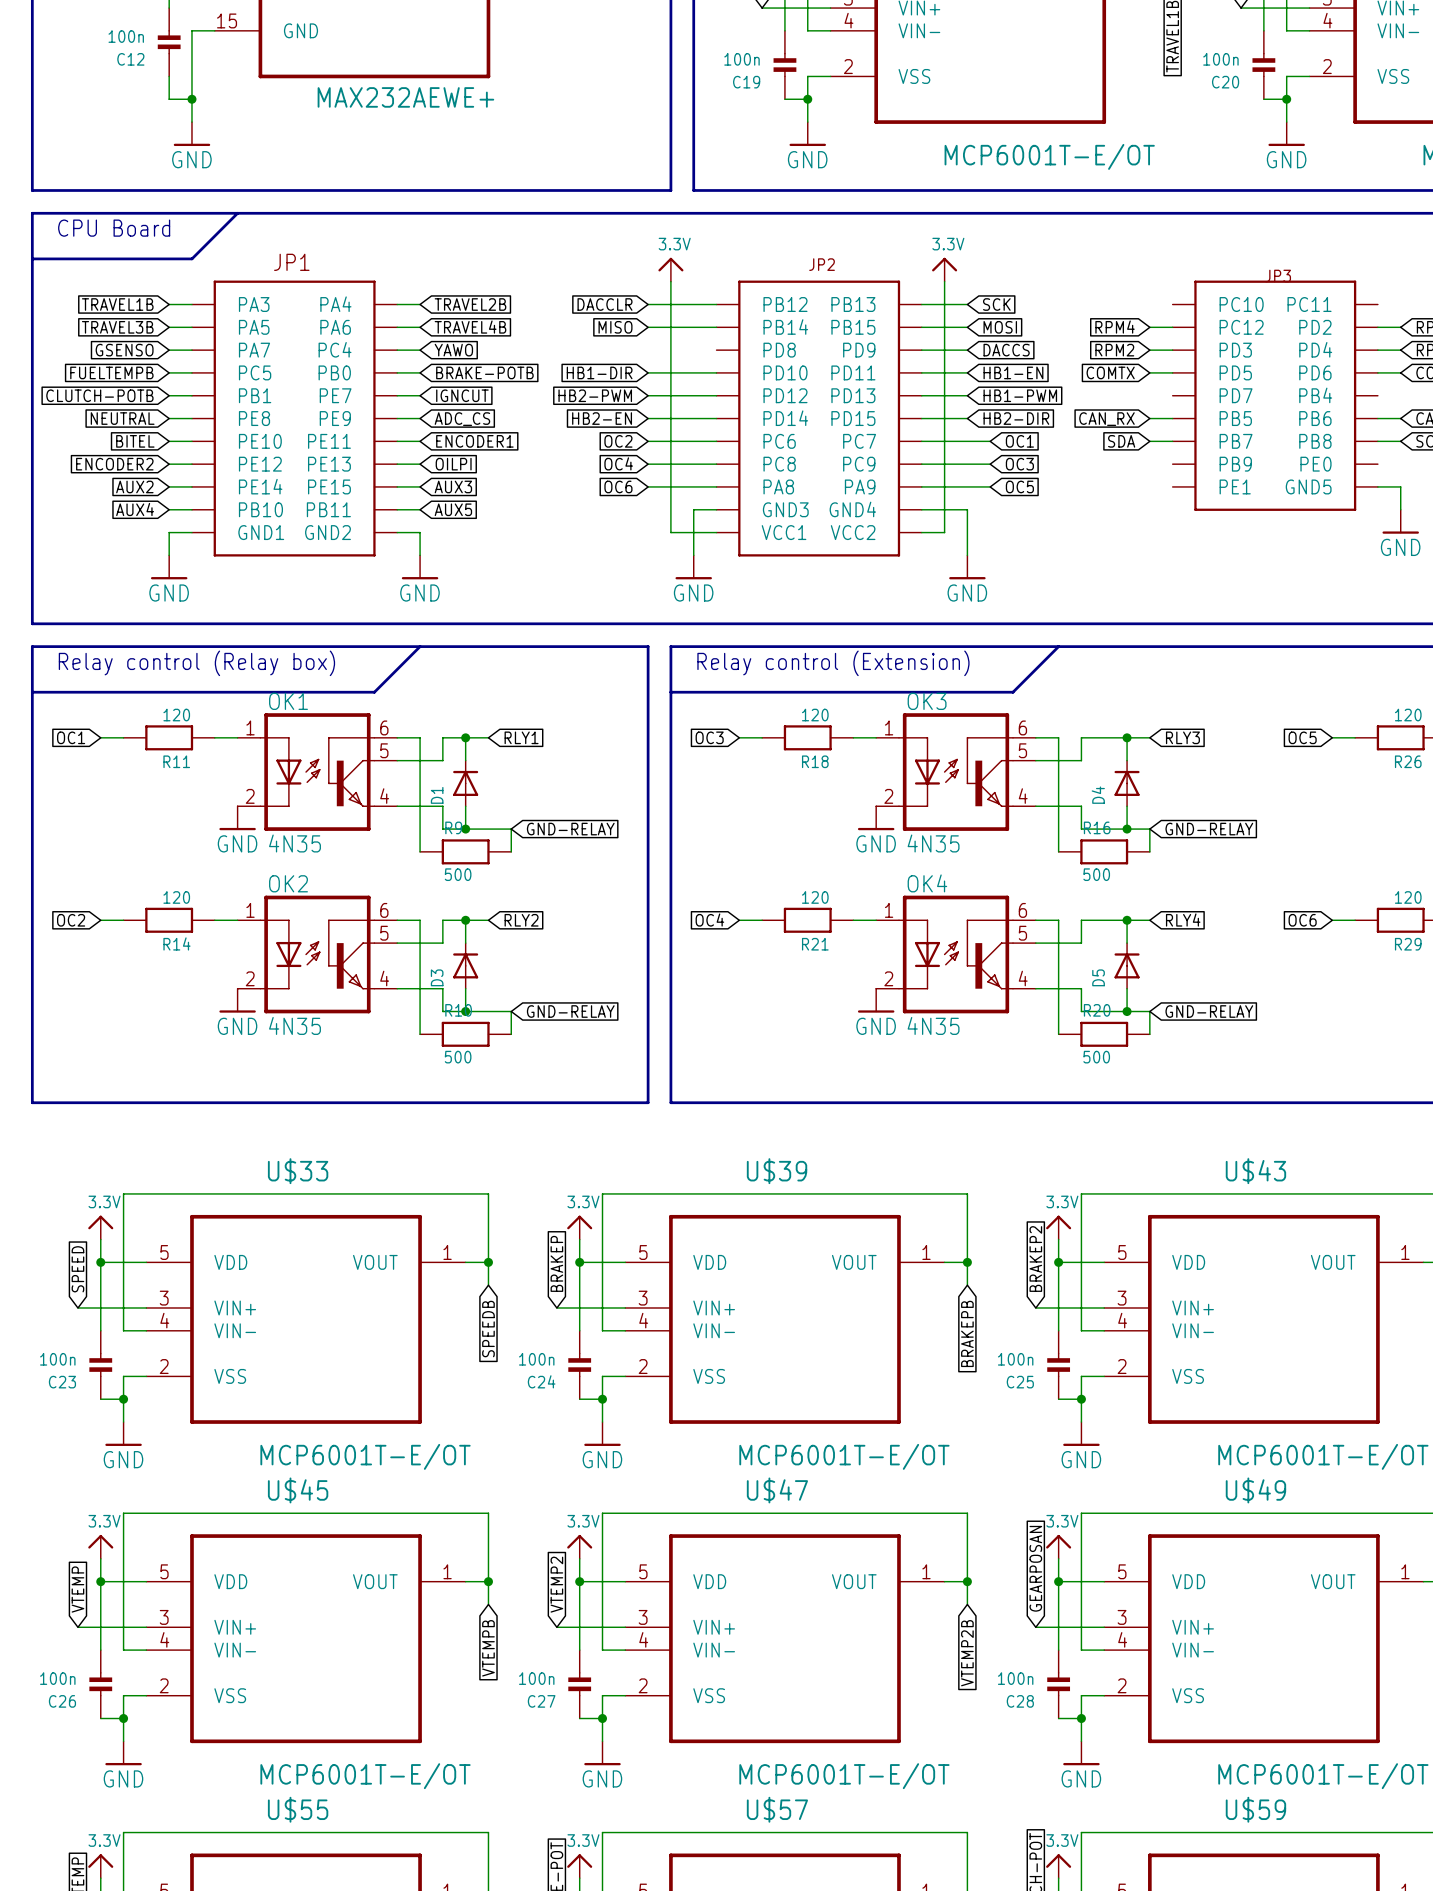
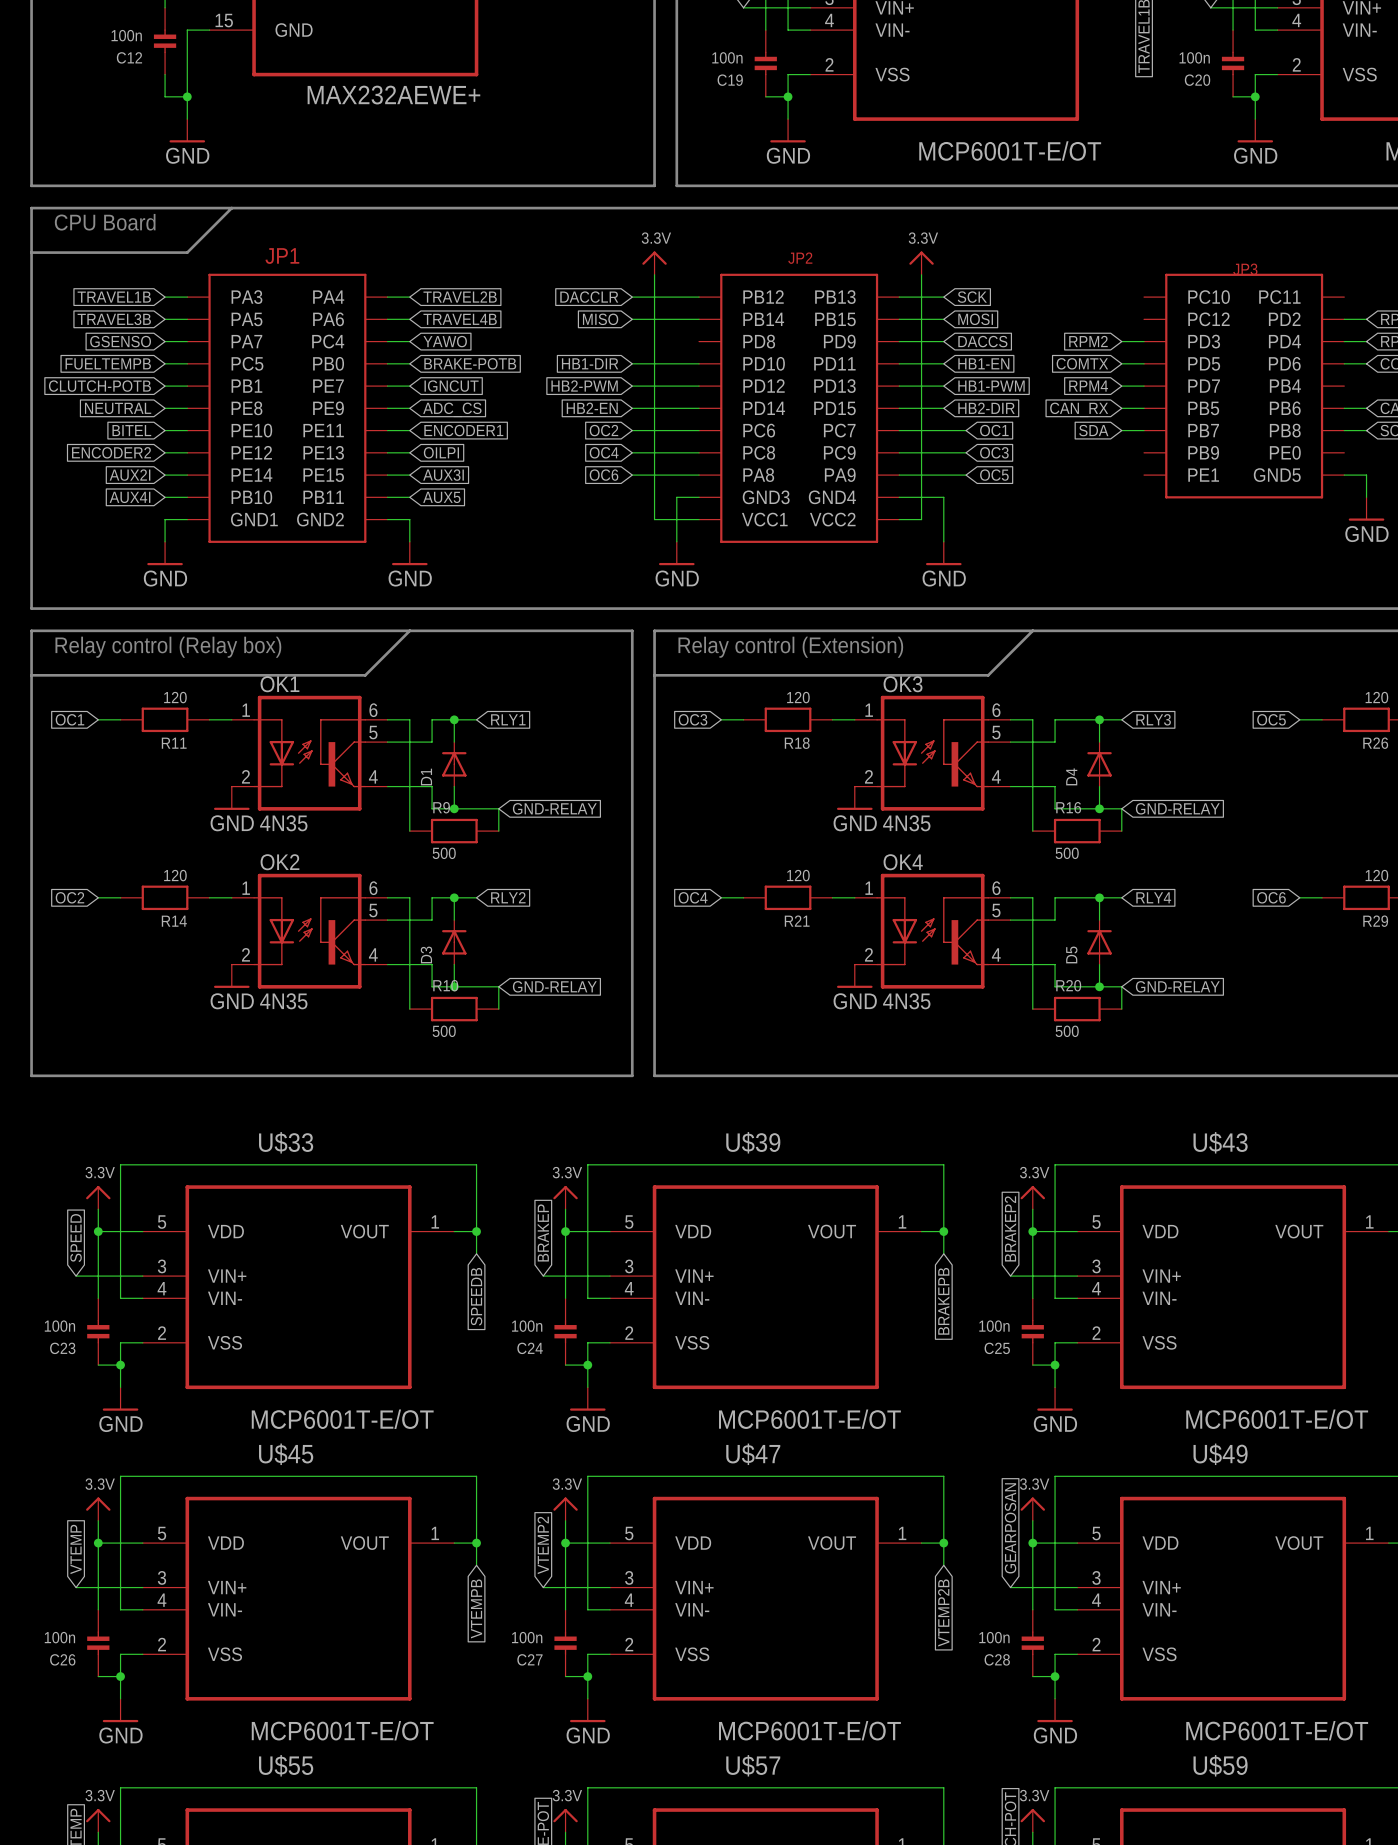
global label position: RPM4 (1115, 327) -> RPM4 (1088, 386)
wire: (1149, 327) (1172, 327) -> (1121, 386) (1144, 386)
global label: AUX2 (134, 486) -> AUX2I (130, 475)
global label: AUX3 (453, 486) -> AUX3I (443, 475)
global label: AUX4 (135, 509) -> AUX4I (130, 497)

